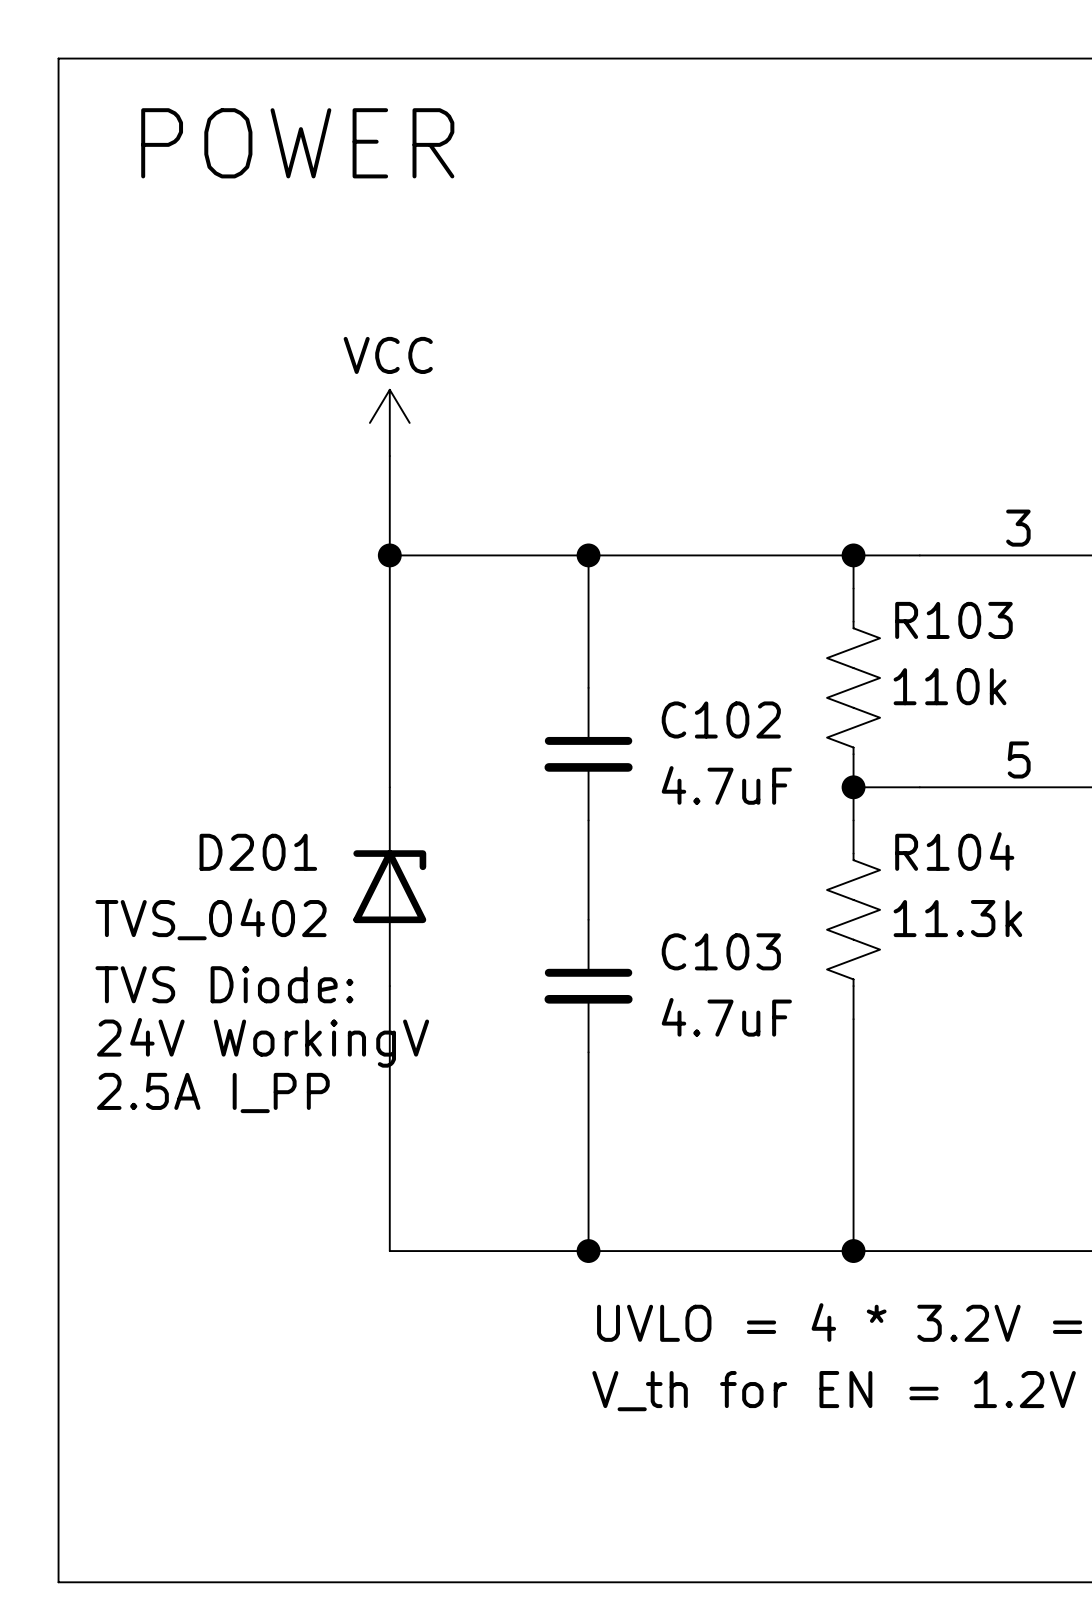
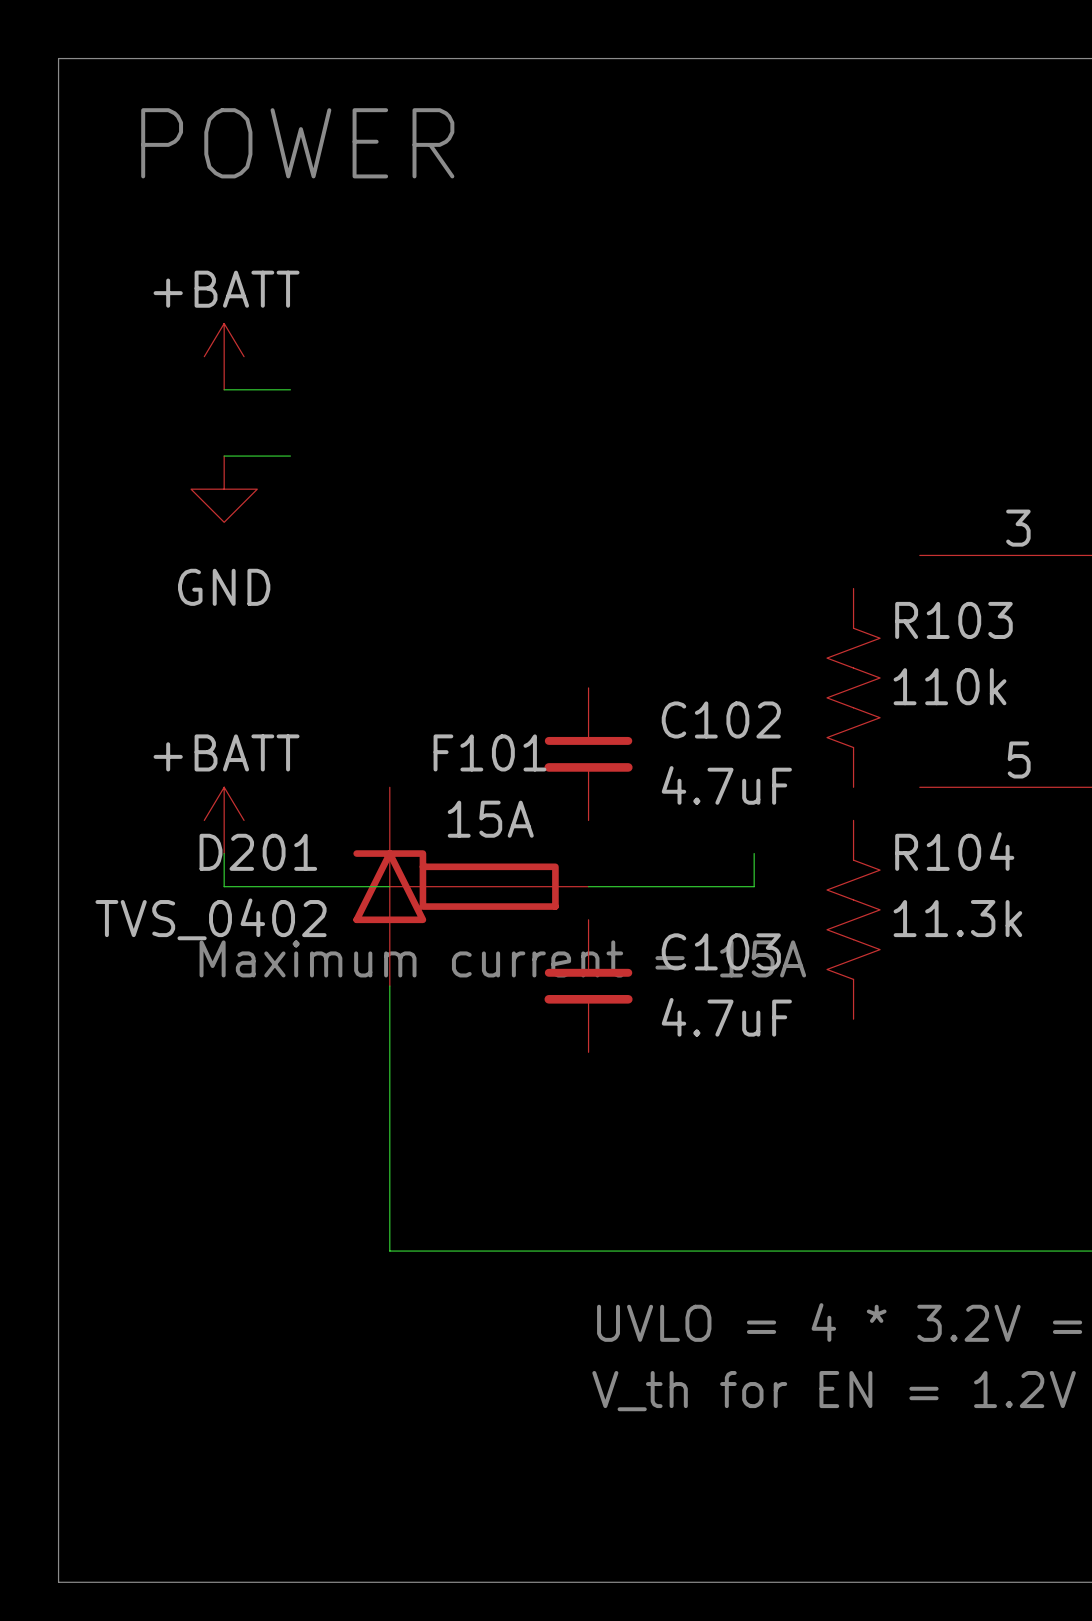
power symbol: none -> +BATT (224, 356)
wire: none -> (224, 389) (290, 389)
power symbol: VCC (389, 422) -> none
wire: none -> (224, 456) (290, 456)
wire: (389, 456) (389, 787) -> none
power symbol: none -> GND (224, 489)
wire: (389, 555) (919, 555) -> none
junction: (389, 555) -> none
wire: (588, 555) (588, 687) -> none
junction: (588, 555) -> none
wire: (853, 555) (853, 588) -> none
junction: (853, 555) -> none
junction: (853, 787) -> none
wire: (919, 787) (853, 787) (853, 820) -> none
power symbol: none -> +BATT (224, 820)
wire: (588, 820) (588, 919) -> none
wire: none -> (224, 853) (224, 886) (389, 886)
wire: none -> (754, 853) (754, 886) (588, 886)
F101: none -> 15A (489, 886)
text: none -> Maximum current = 15A (502, 958)
text: TVS Diode: (224, 984) -> none
wire: (853, 1019) (853, 1251) -> none
text: 24V WorkingV (263, 1042) -> none
wire: (588, 1052) (588, 1251) -> none
text: 2.5A I_PP (213, 1092) -> none
junction: (588, 1251) -> none
junction: (853, 1251) -> none

